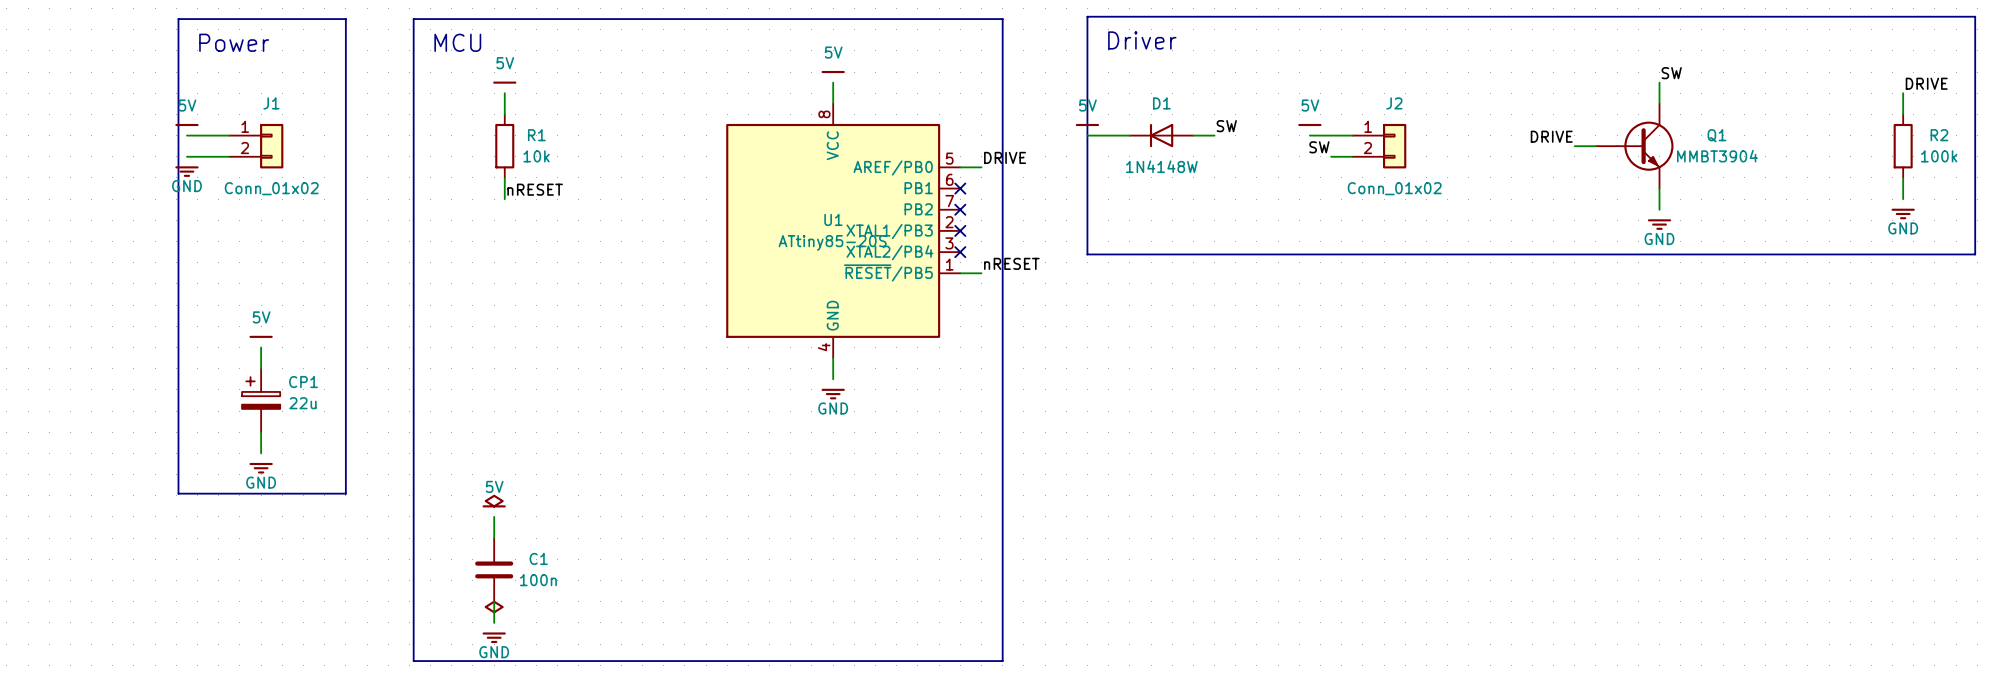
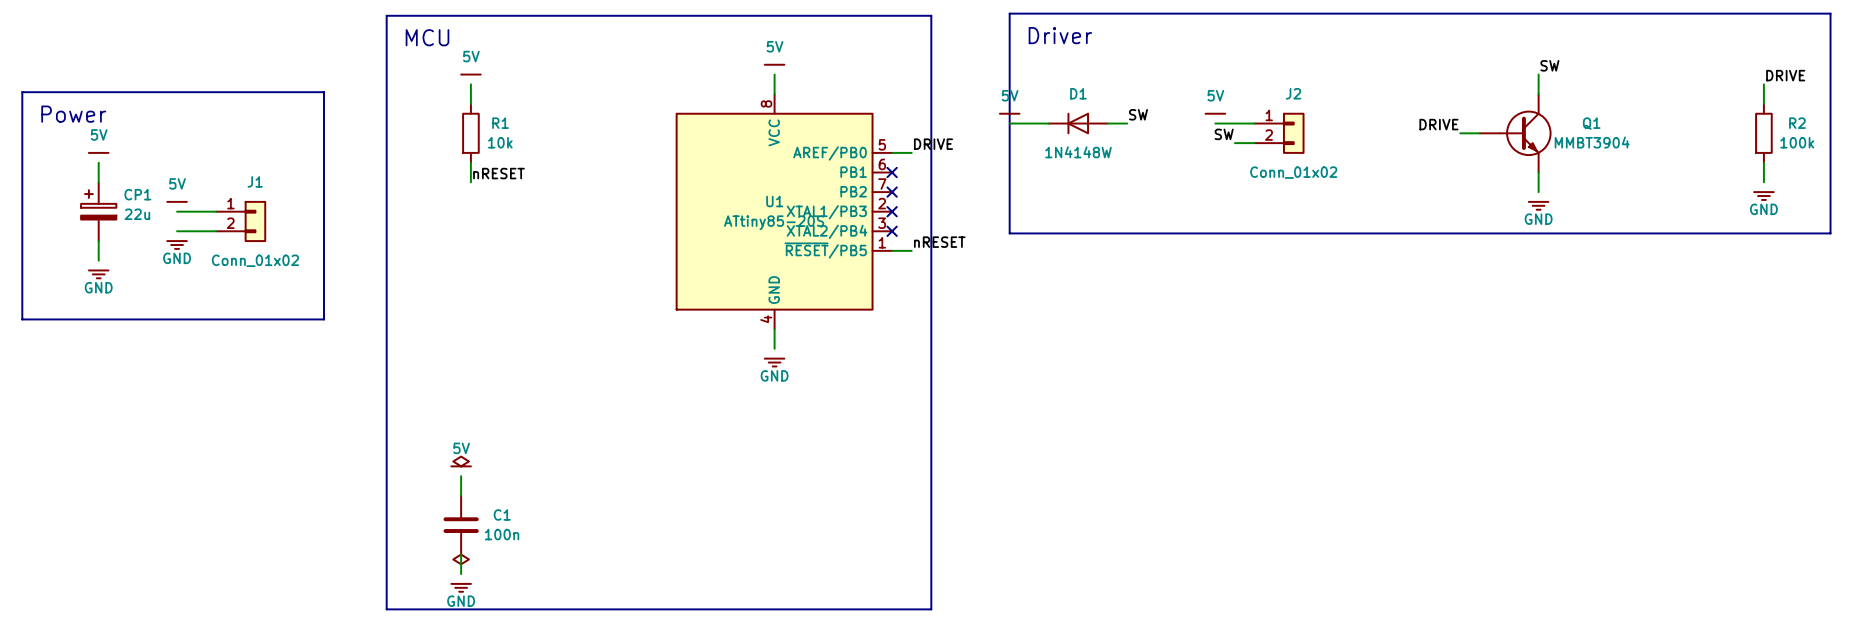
text position: Power (234, 42) -> Power (73, 114)
line: (345, 101) (345, 19) (178, 19) (178, 493) (345, 493) (345, 347) -> (323, 92) (22, 92) (22, 319) (323, 319)
power symbol: 5V (186, 124) -> none
wire: (186, 135) (229, 135) -> (177, 211) (216, 211)
J1 position: (256, 146) -> (241, 221)
wire: (186, 156) (229, 156) -> (177, 231) (216, 231)
power symbol: none -> 5V (98, 152)
power symbol: GND (186, 171) -> none
wire: none -> (98, 162) (98, 182)
power symbol: none -> 5V (177, 201)
power symbol: none -> GND (177, 244)
power symbol: none -> GND (98, 274)
power symbol: 5V (261, 336) -> none
wire: (261, 347) (261, 368) -> (98, 241) (98, 260)
CP1 position: (261, 400) -> (98, 211)
wire: (261, 432) (261, 453) -> none
power symbol: GND (261, 468) -> none

